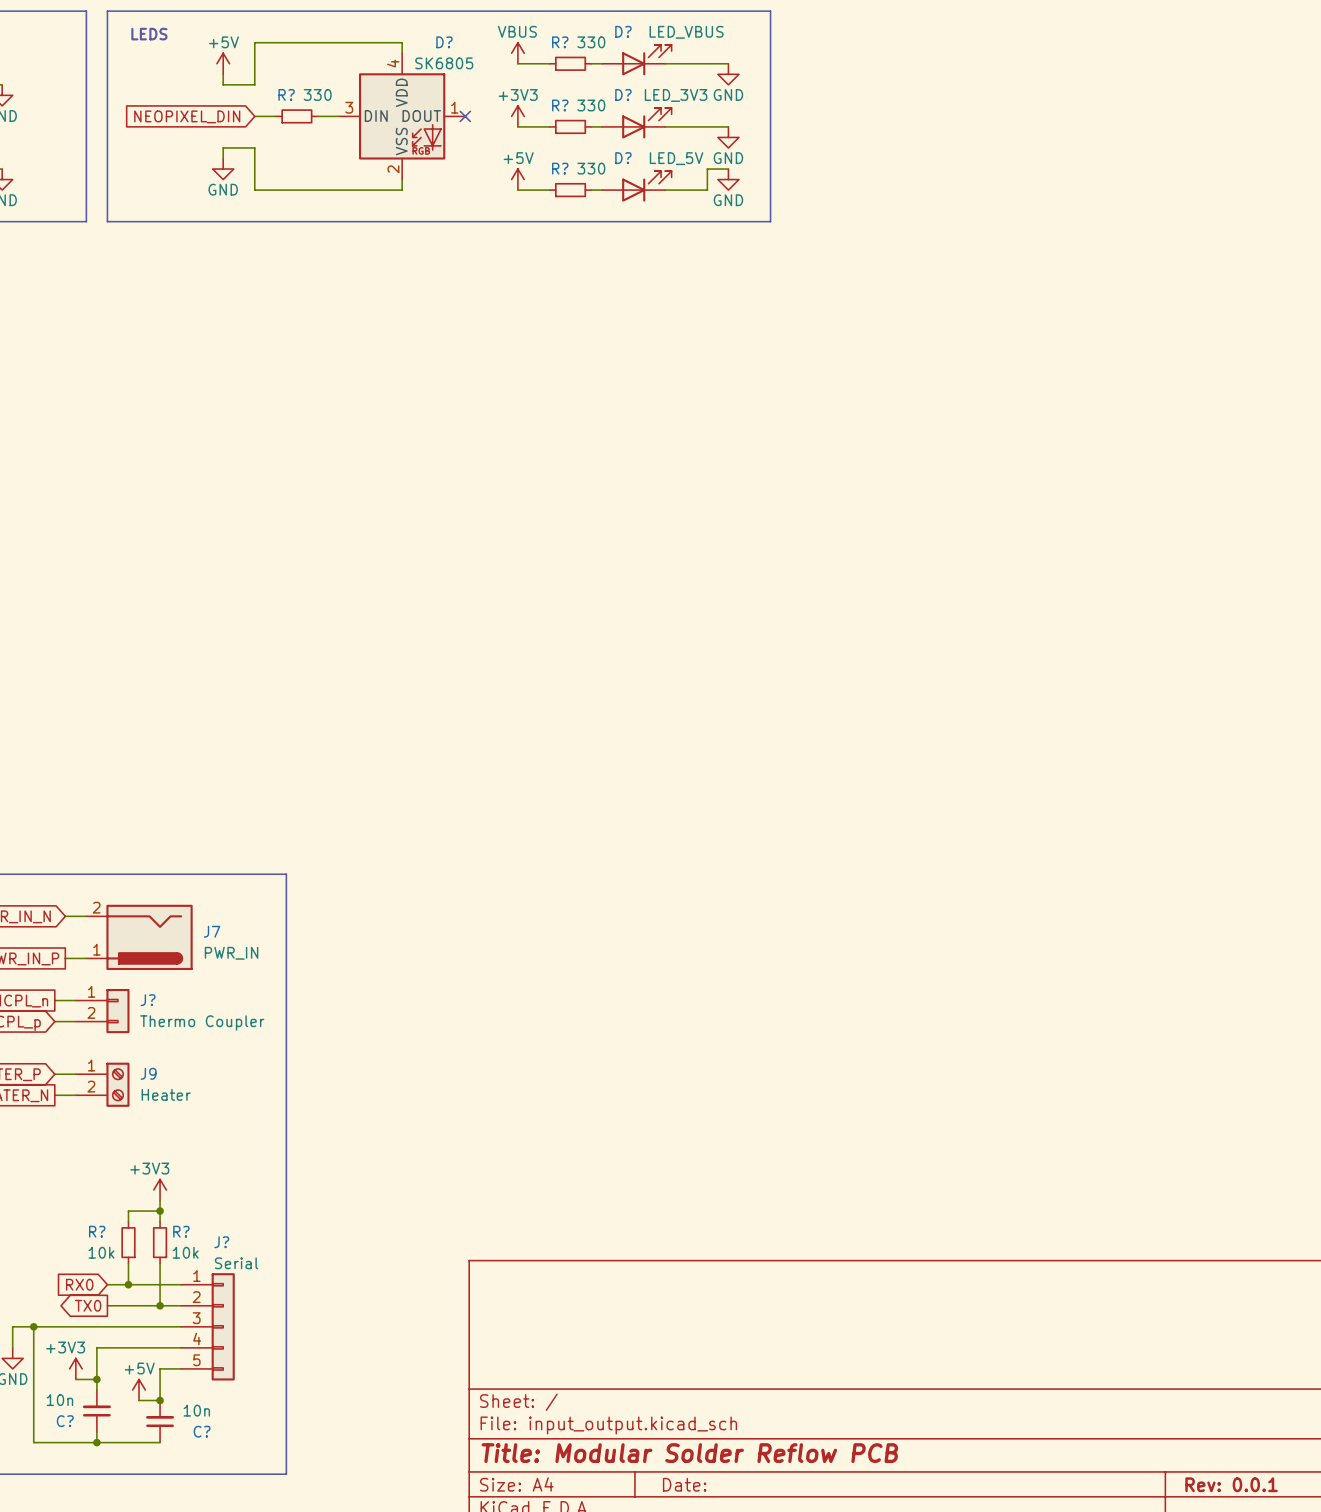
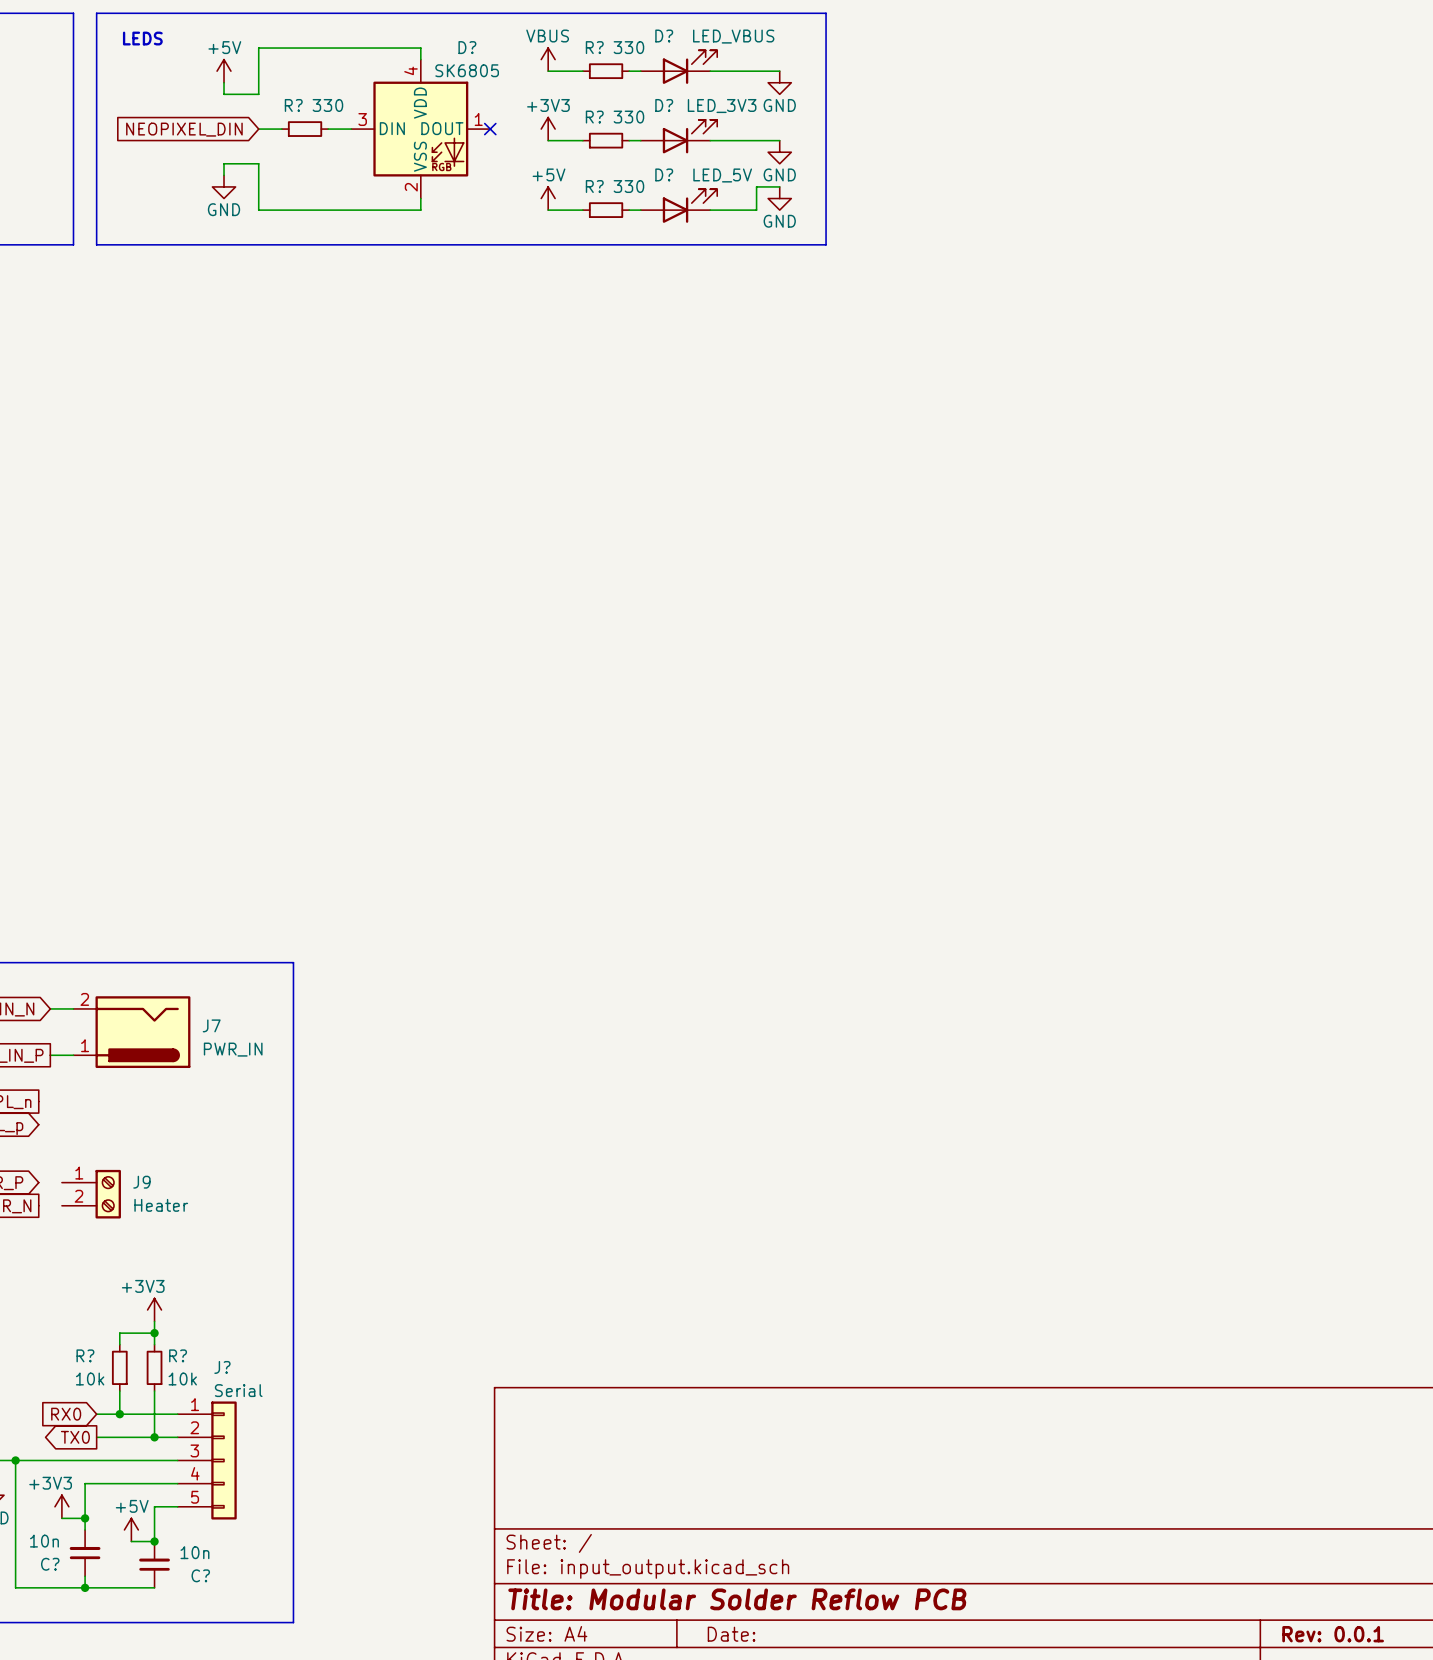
wire: (54, 1000) (75, 1000) -> none
J?: Thermo Coupler (102, 1011) -> none
wire: (54, 1021) (75, 1021) -> none
wire: (54, 1074) (75, 1074) -> none
wire: (54, 1095) (75, 1095) -> none

